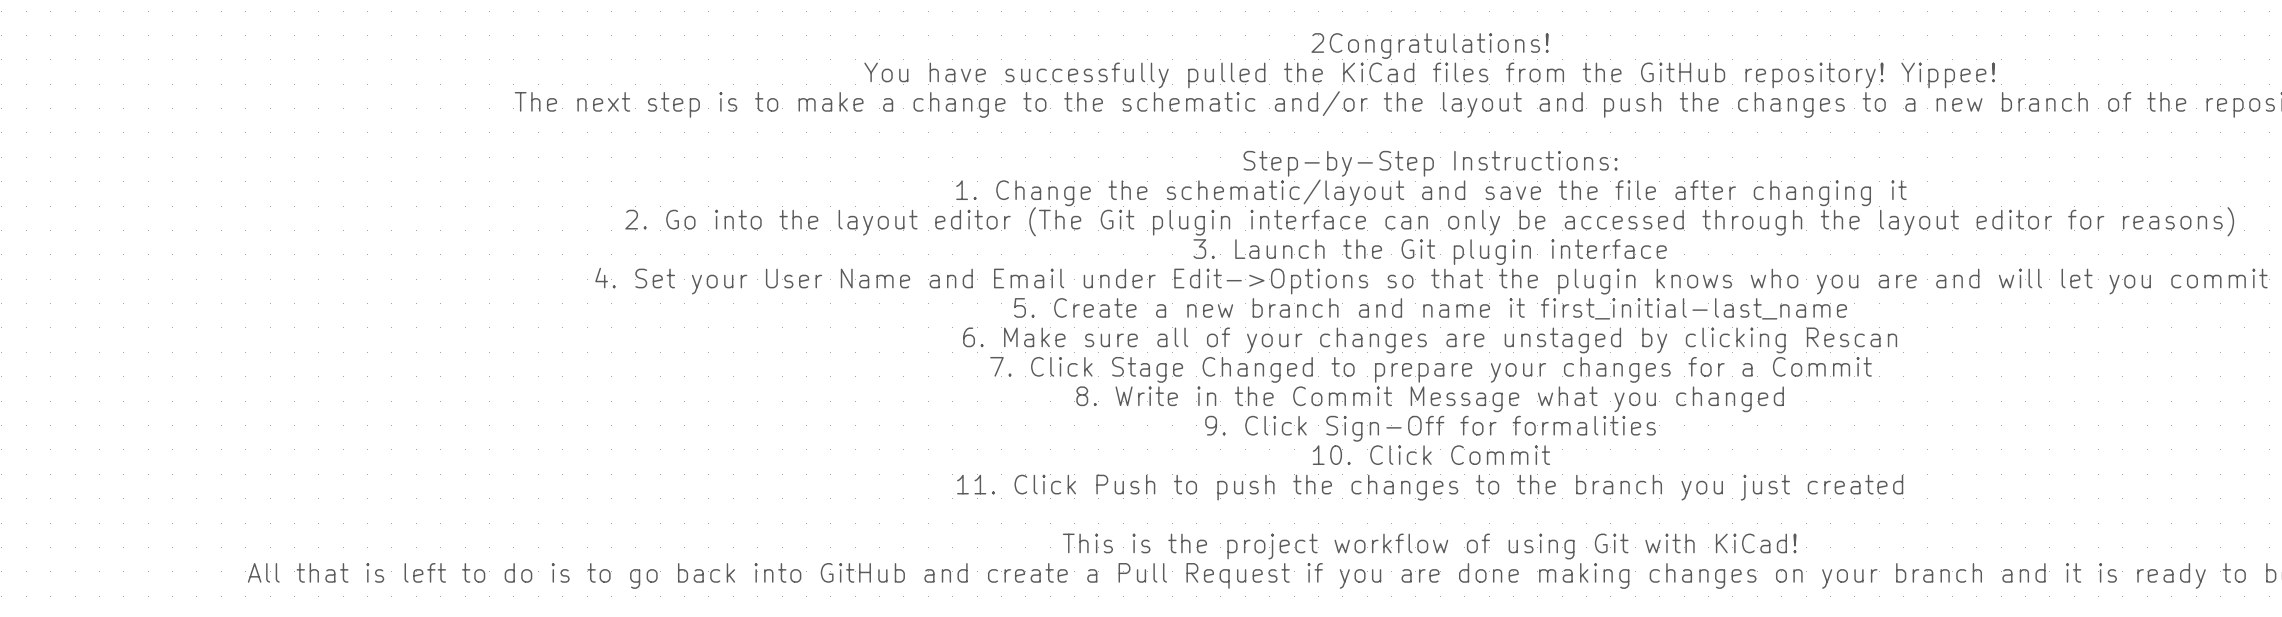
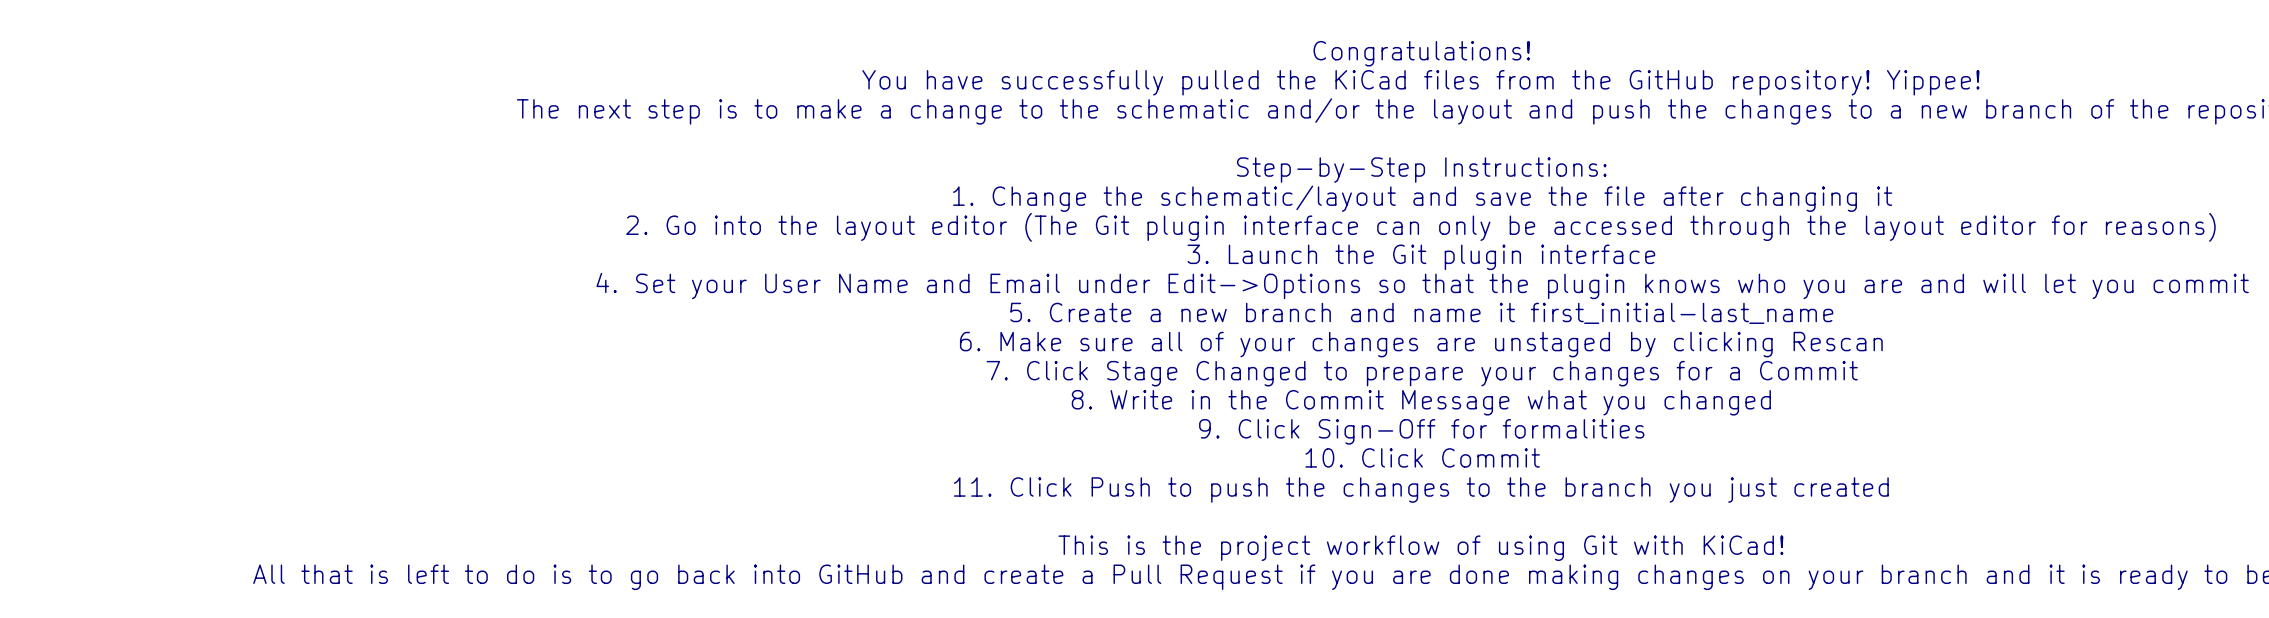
text: 2Congratulations! (1430, 46) -> Congratulations! (1421, 53)

